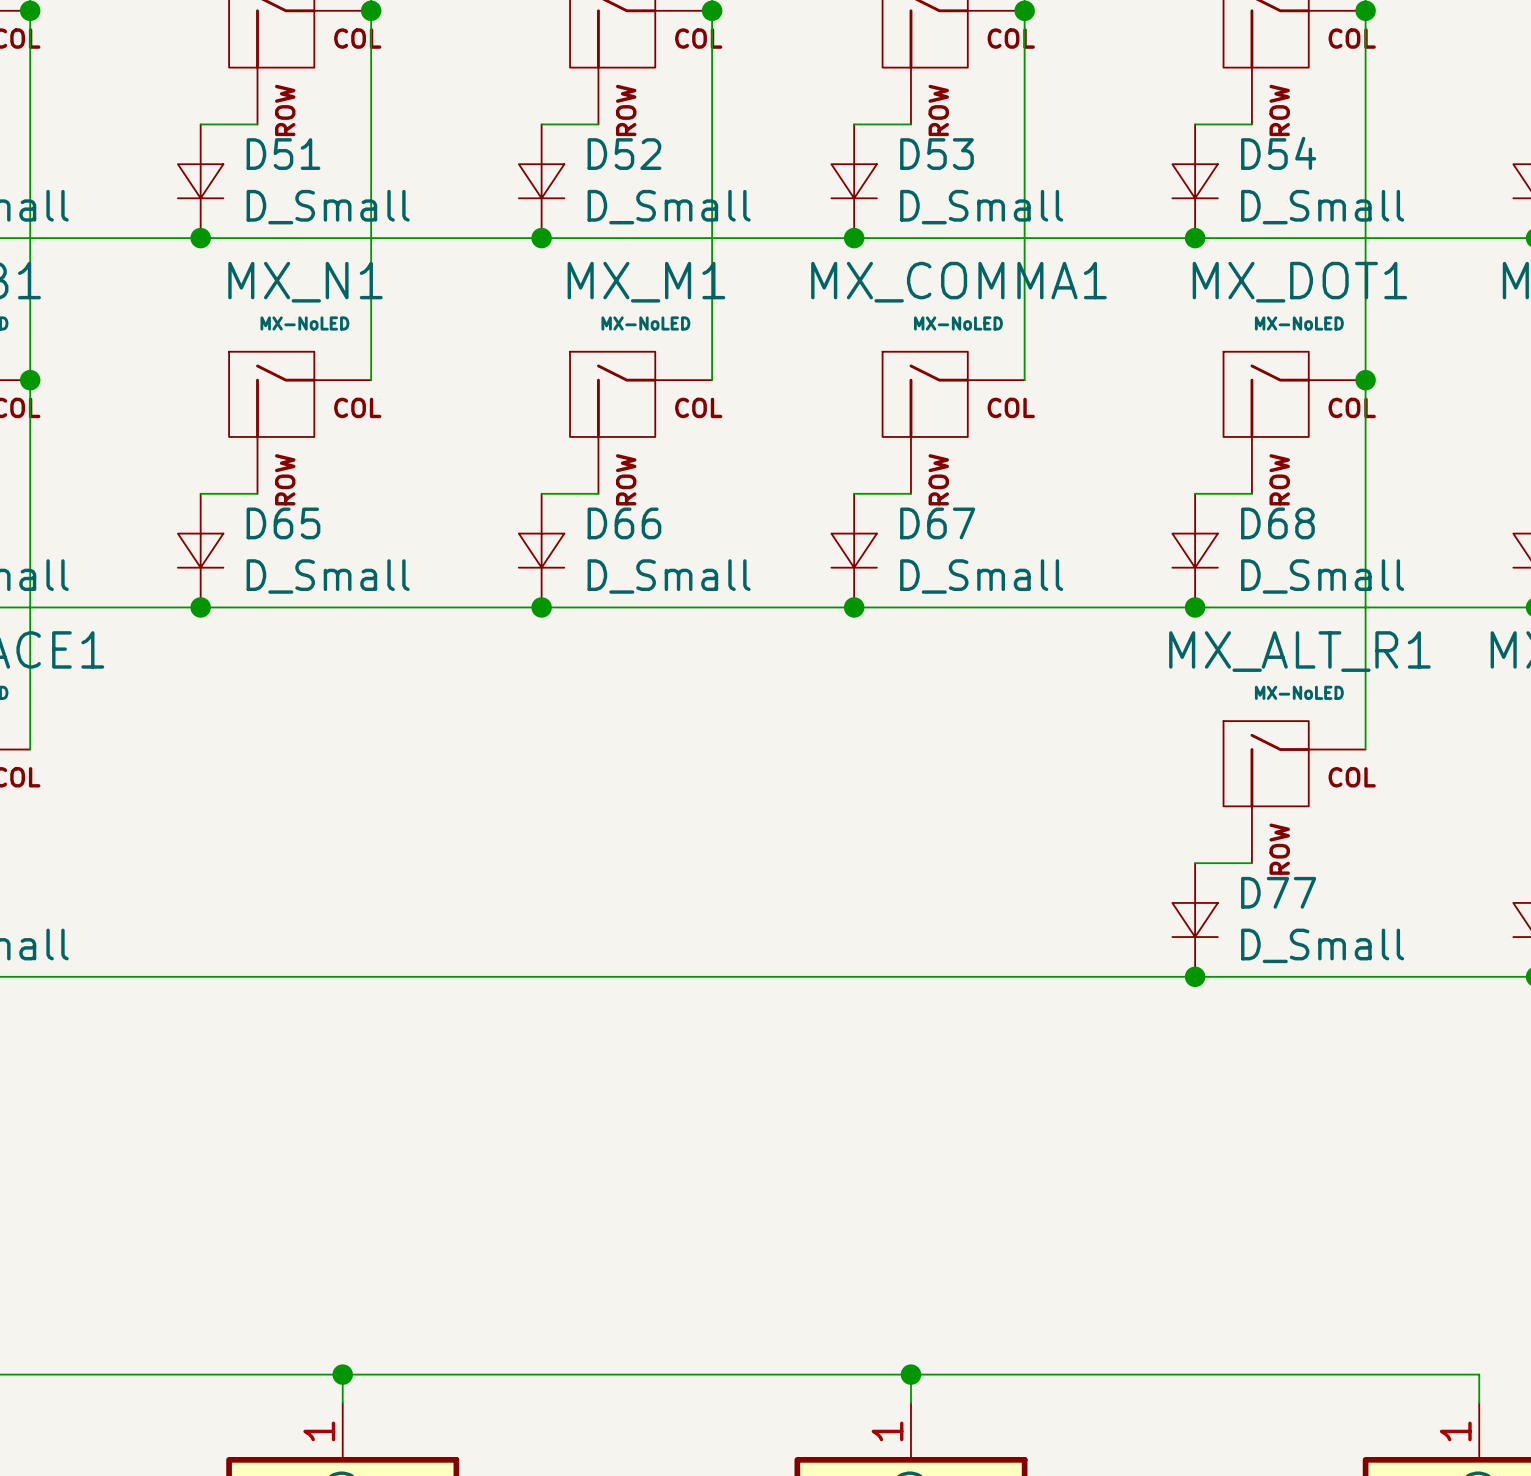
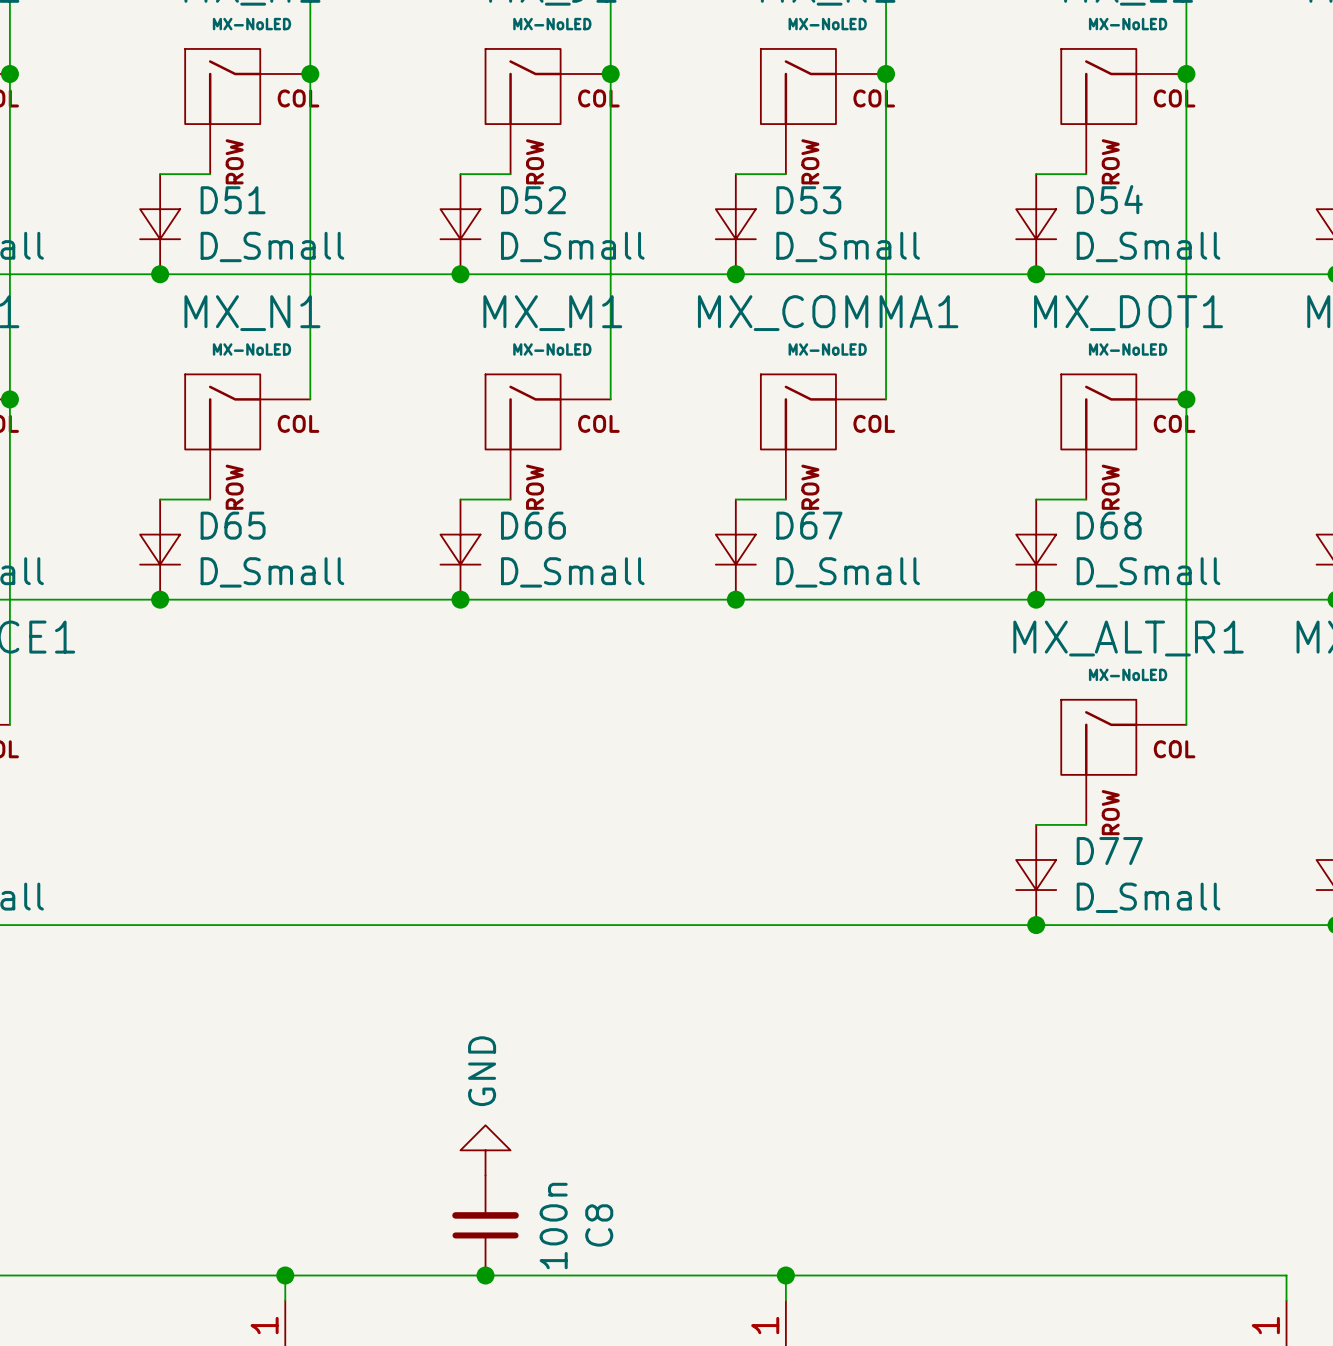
power symbol: none -> GND (485, 1150)
C8: none -> 100n (485, 1225)
junction: none -> (485, 1275)

